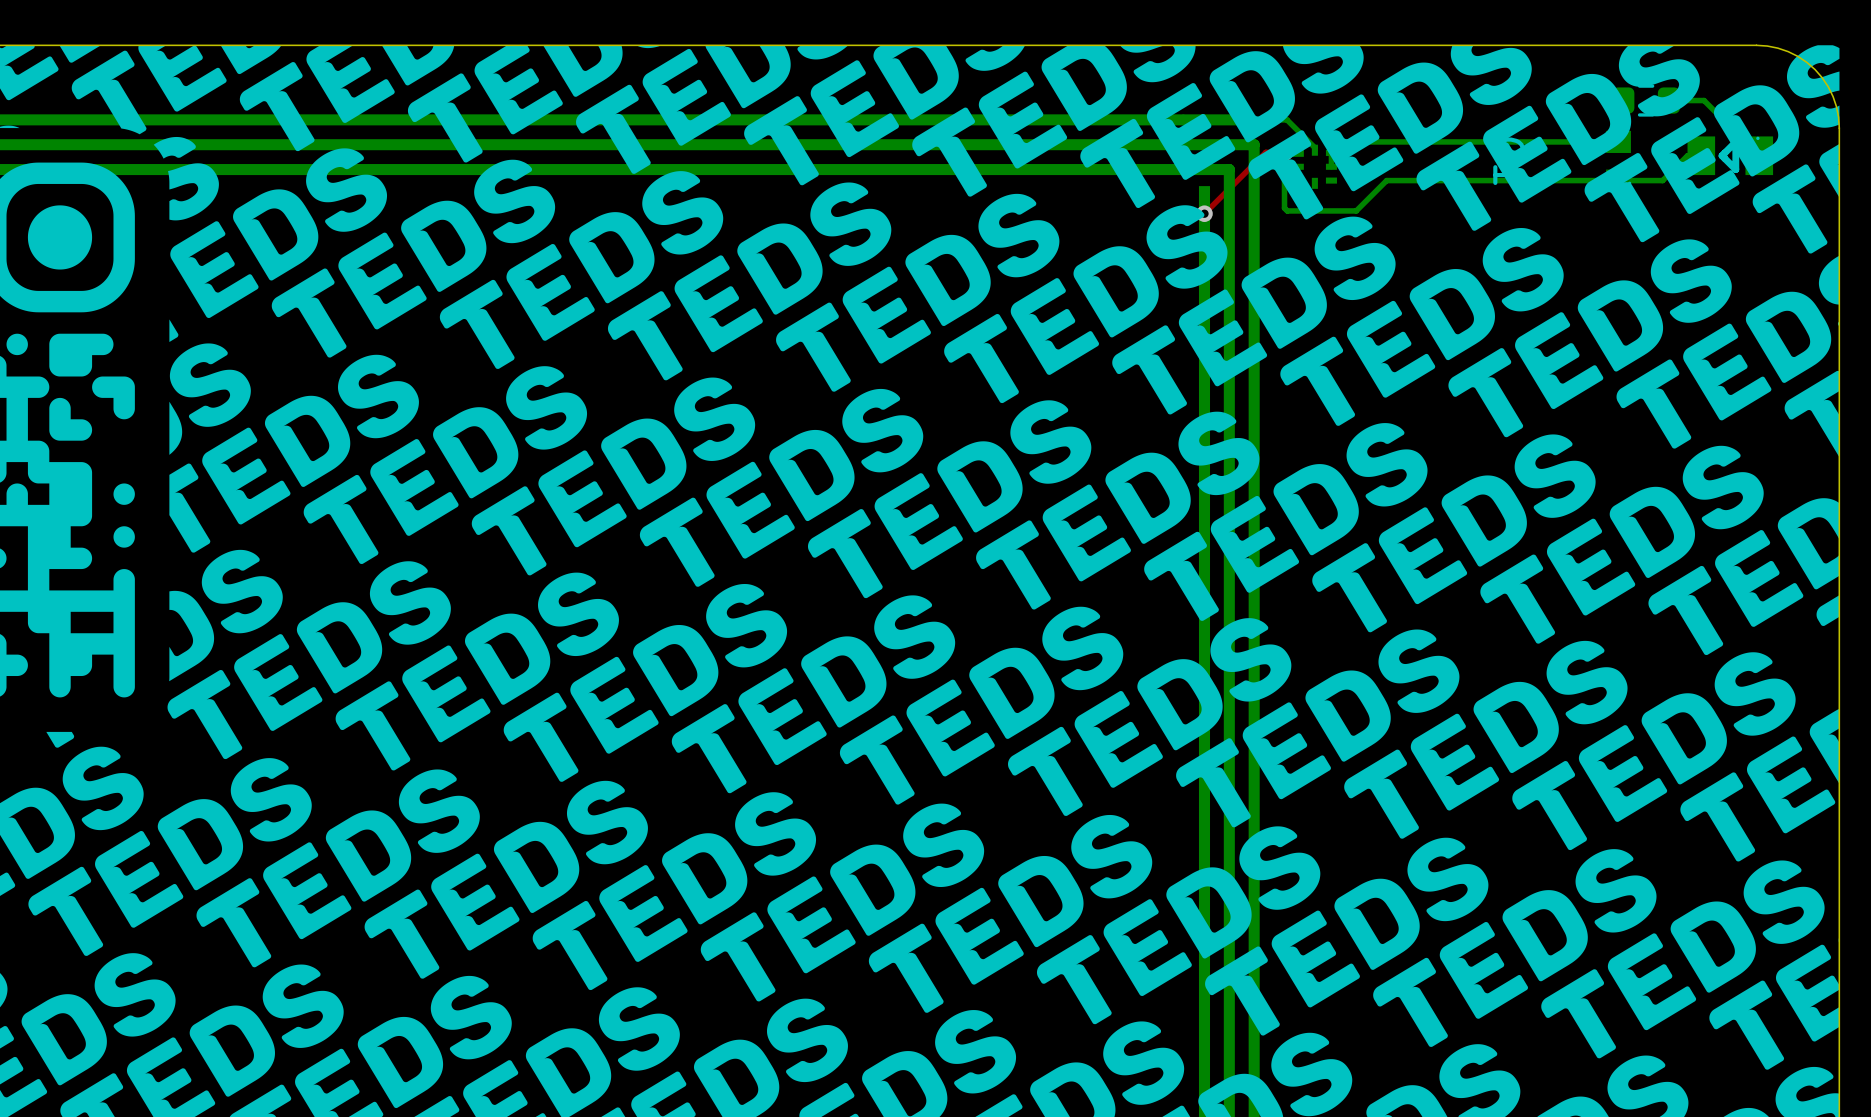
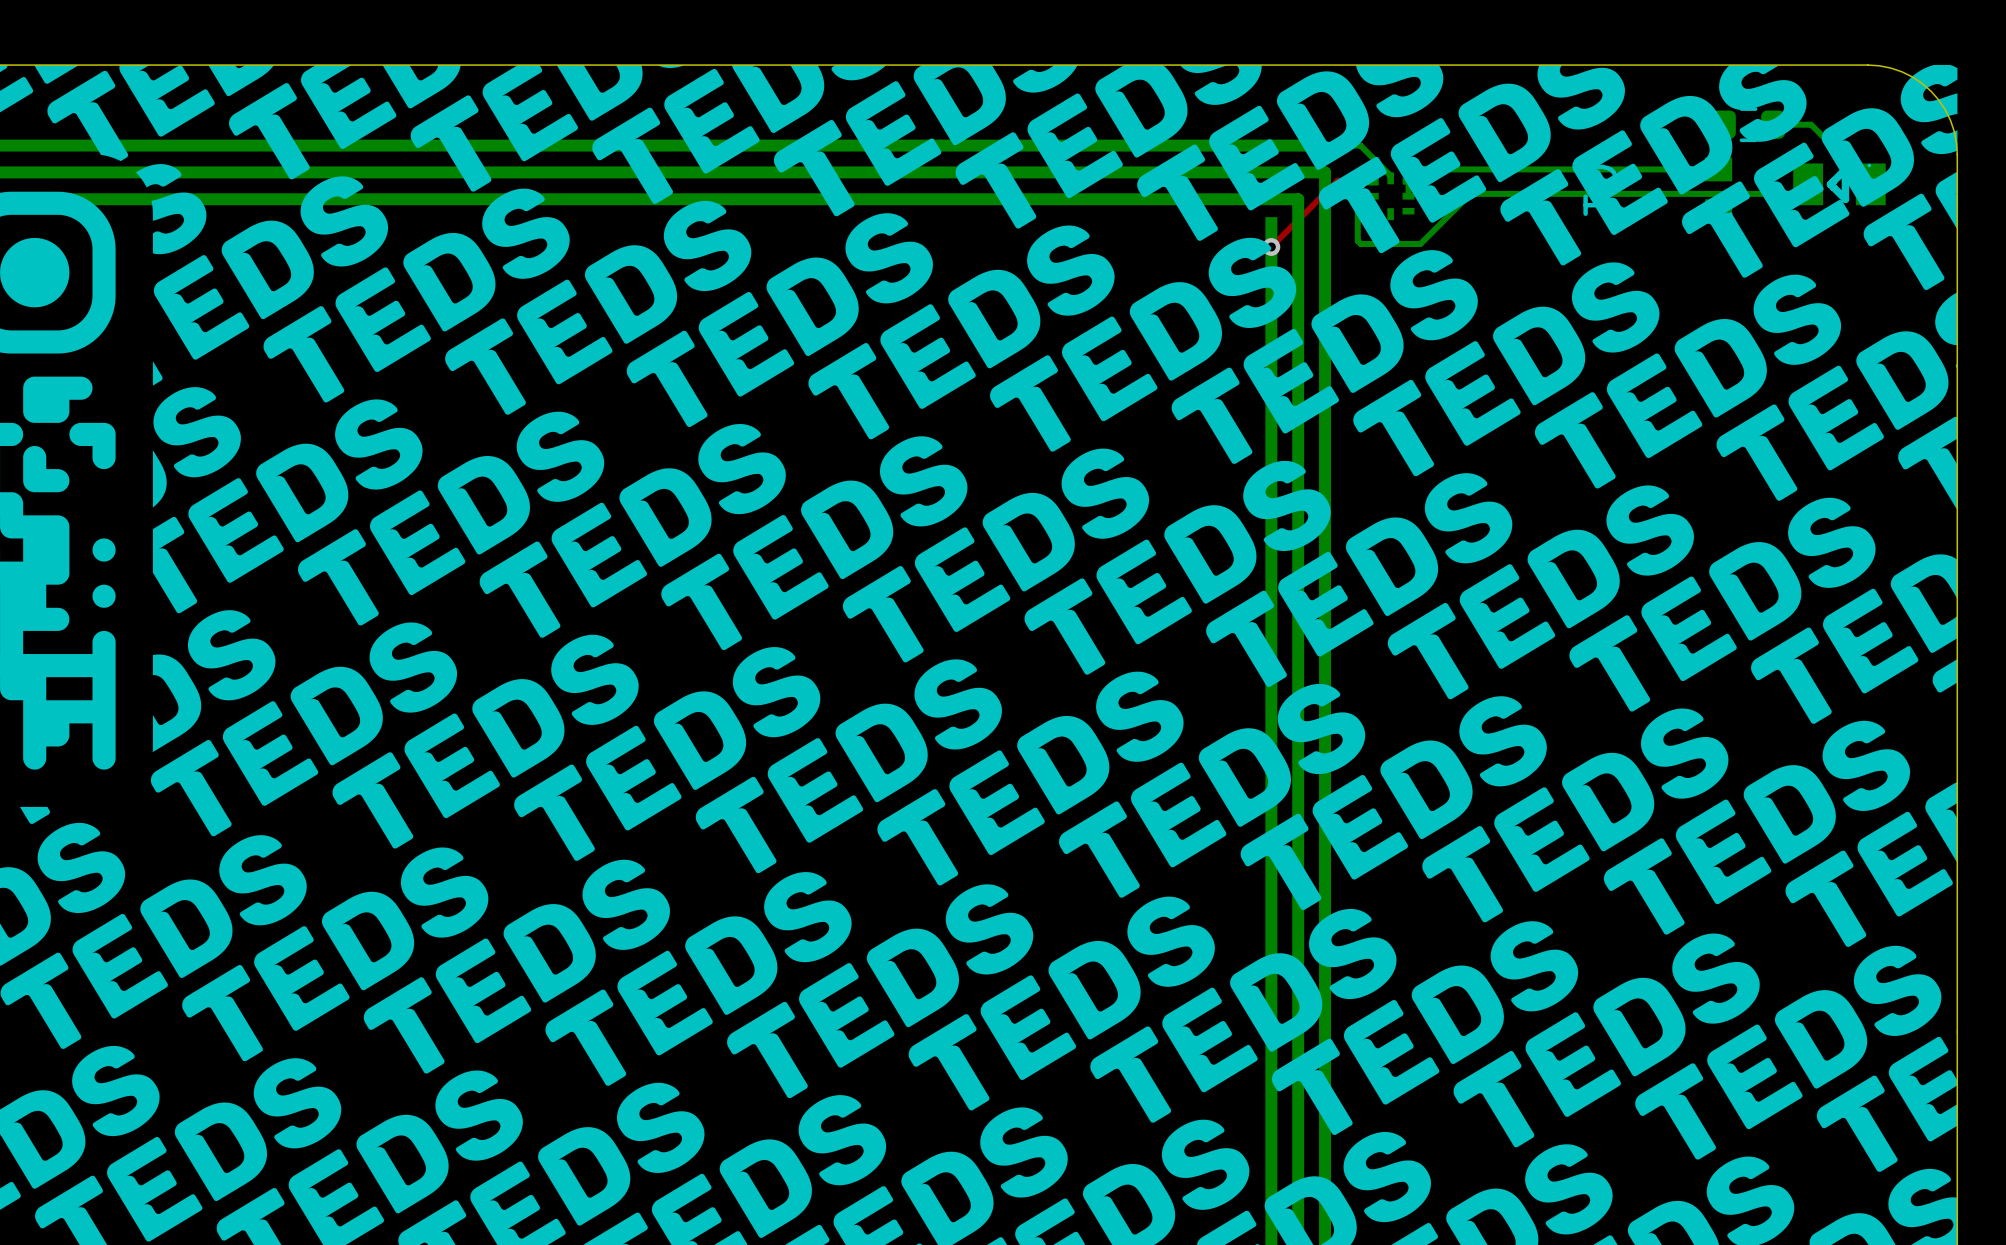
bottom track: (1701, 155) (1687, 155) (1662, 180) (1386, 180) (1356, 210) (1342, 210) -> (1798, 193) (1470, 193) (1420, 243)

